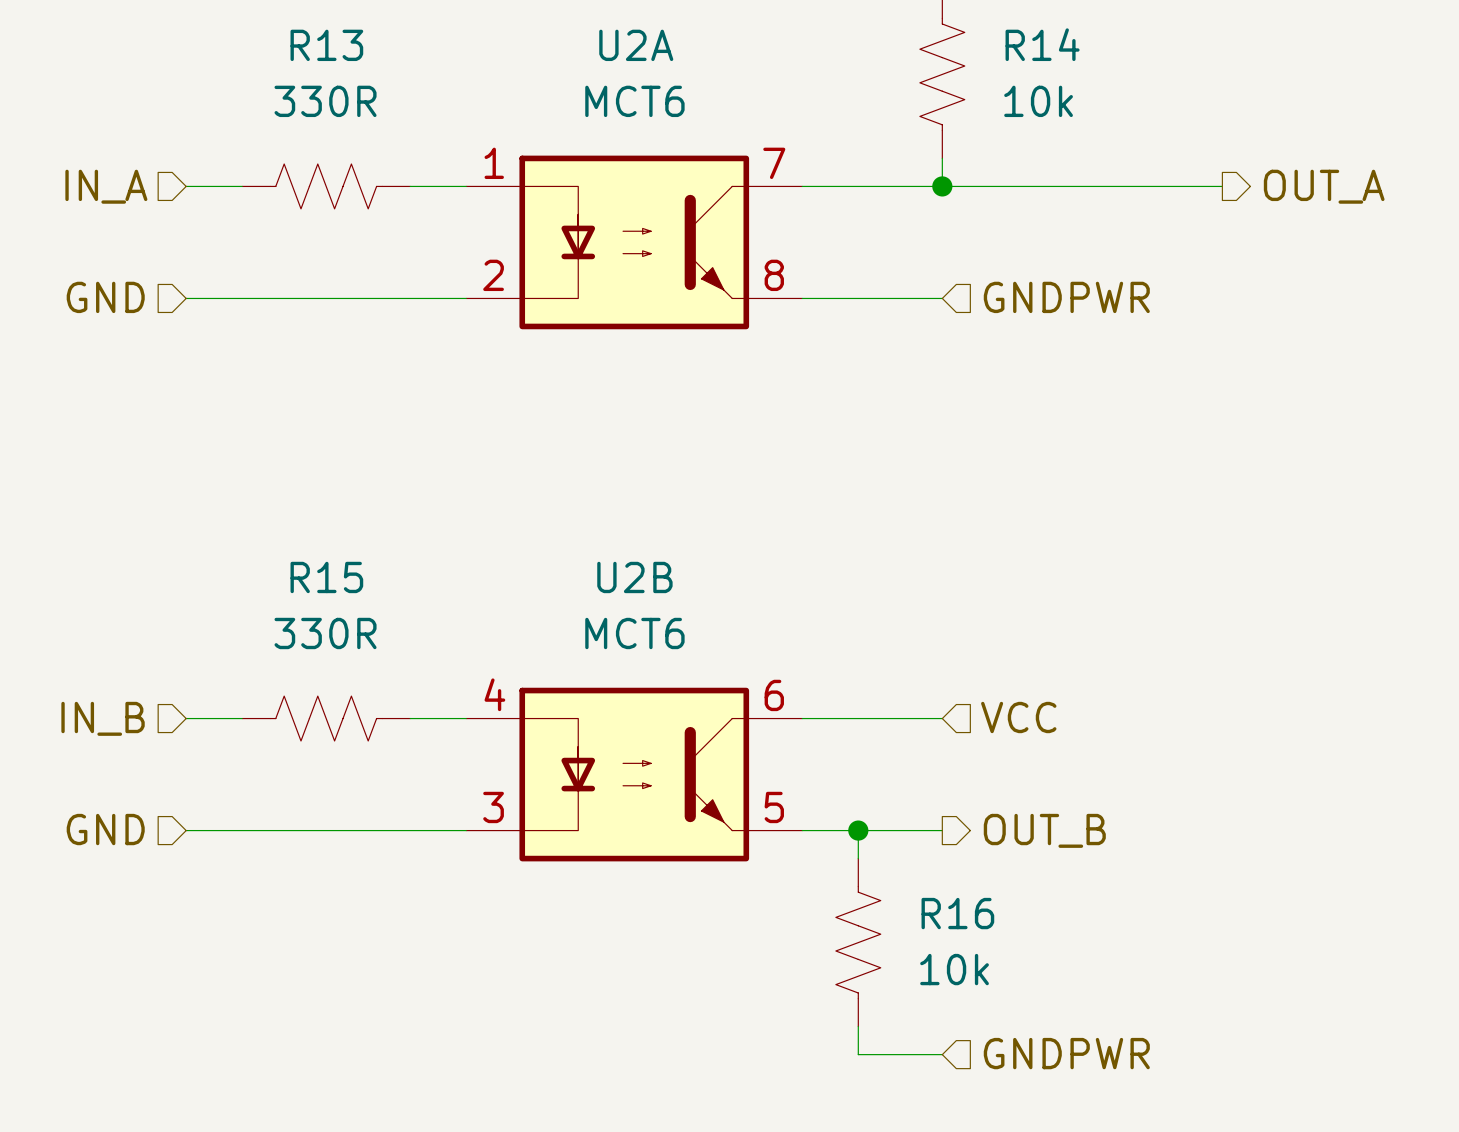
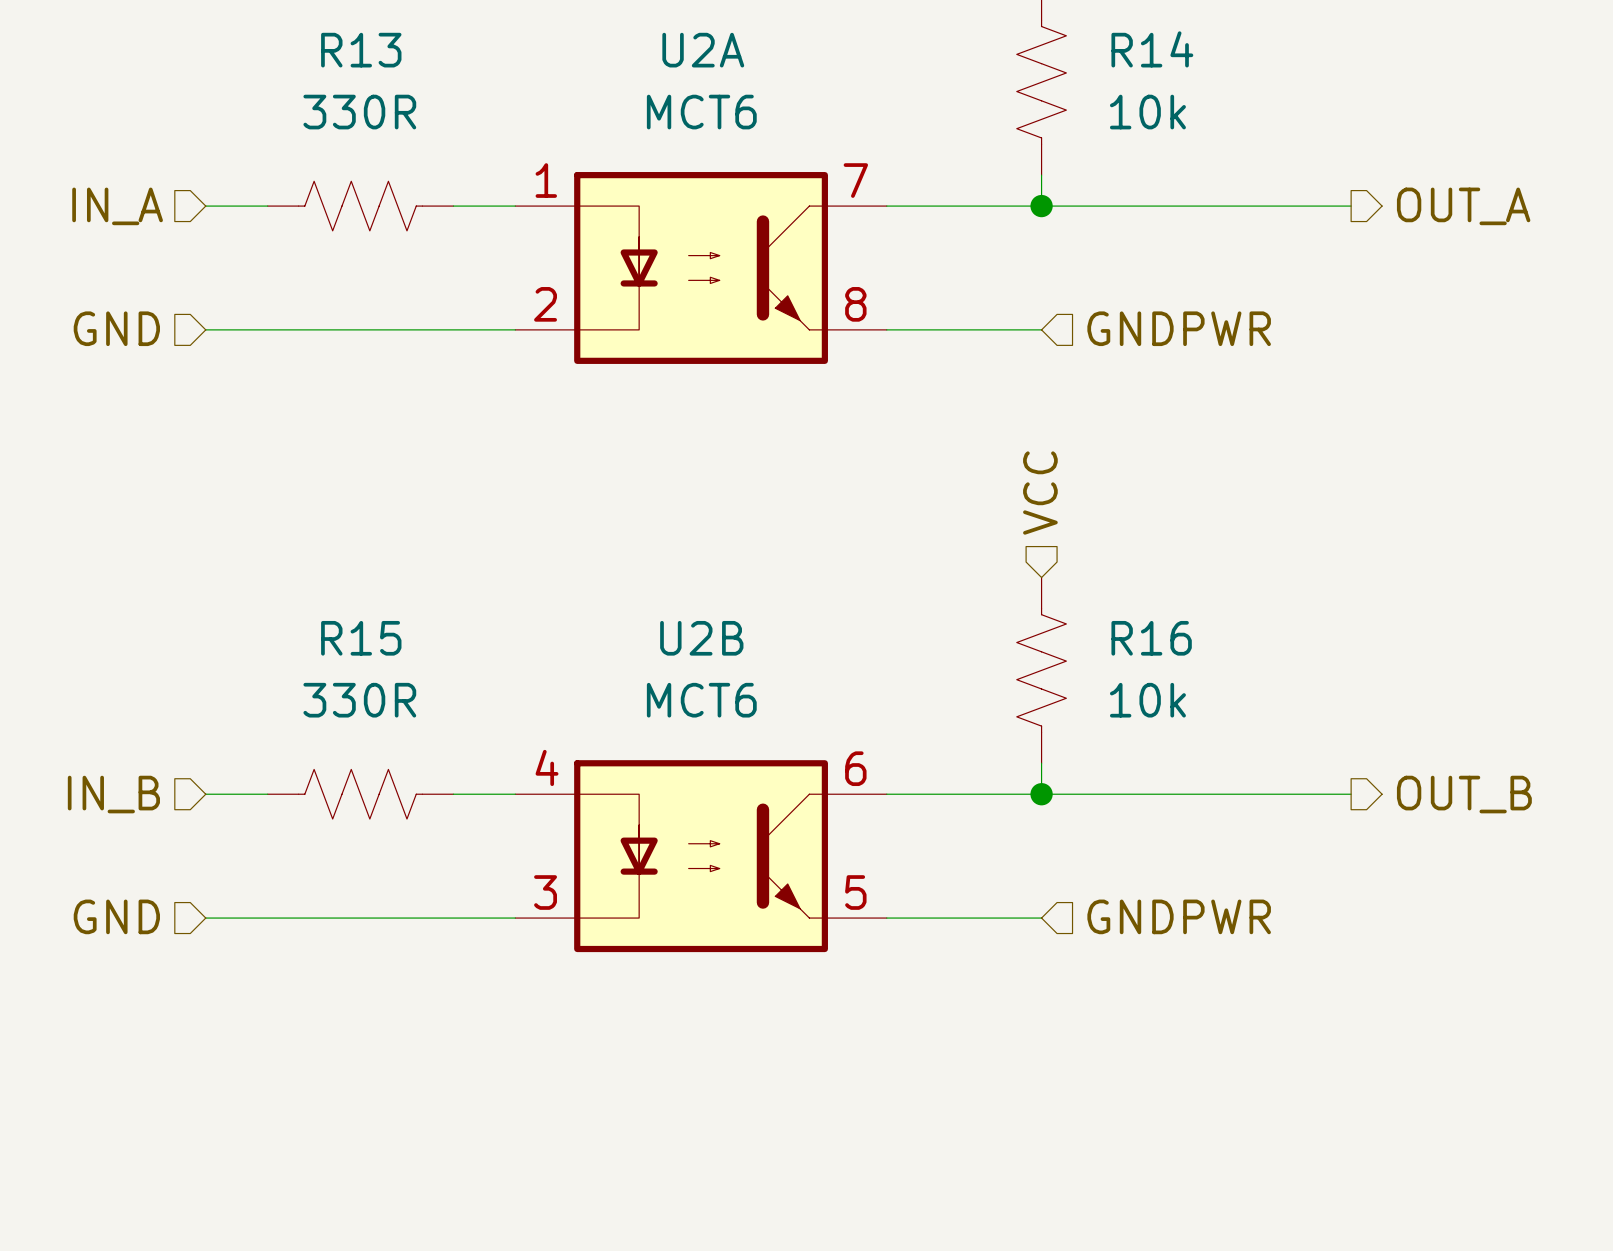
wire: none -> (1041, 763) (1041, 794) (1351, 794)
hierarchical label rotation: 0° (1018, 717) -> 90° counterclockwise (1040, 493)
hierarchical label position: VCC (1018, 717) -> VCC (1040, 493)
junction: none -> (1041, 794)
hierarchical label: none -> OUT_B (1464, 794)
wire: (858, 830) (858, 858) -> none
junction: (858, 830) -> none
hierarchical label shape: output (1044, 830) -> input (1179, 916)
hierarchical label: OUT_B (1044, 830) -> GNDPWR (1179, 916)
R16 position: (858, 942) -> (1041, 670)
wire: (858, 1026) (858, 1054) (942, 1054) -> none
hierarchical label: GNDPWR (1066, 1053) -> none

